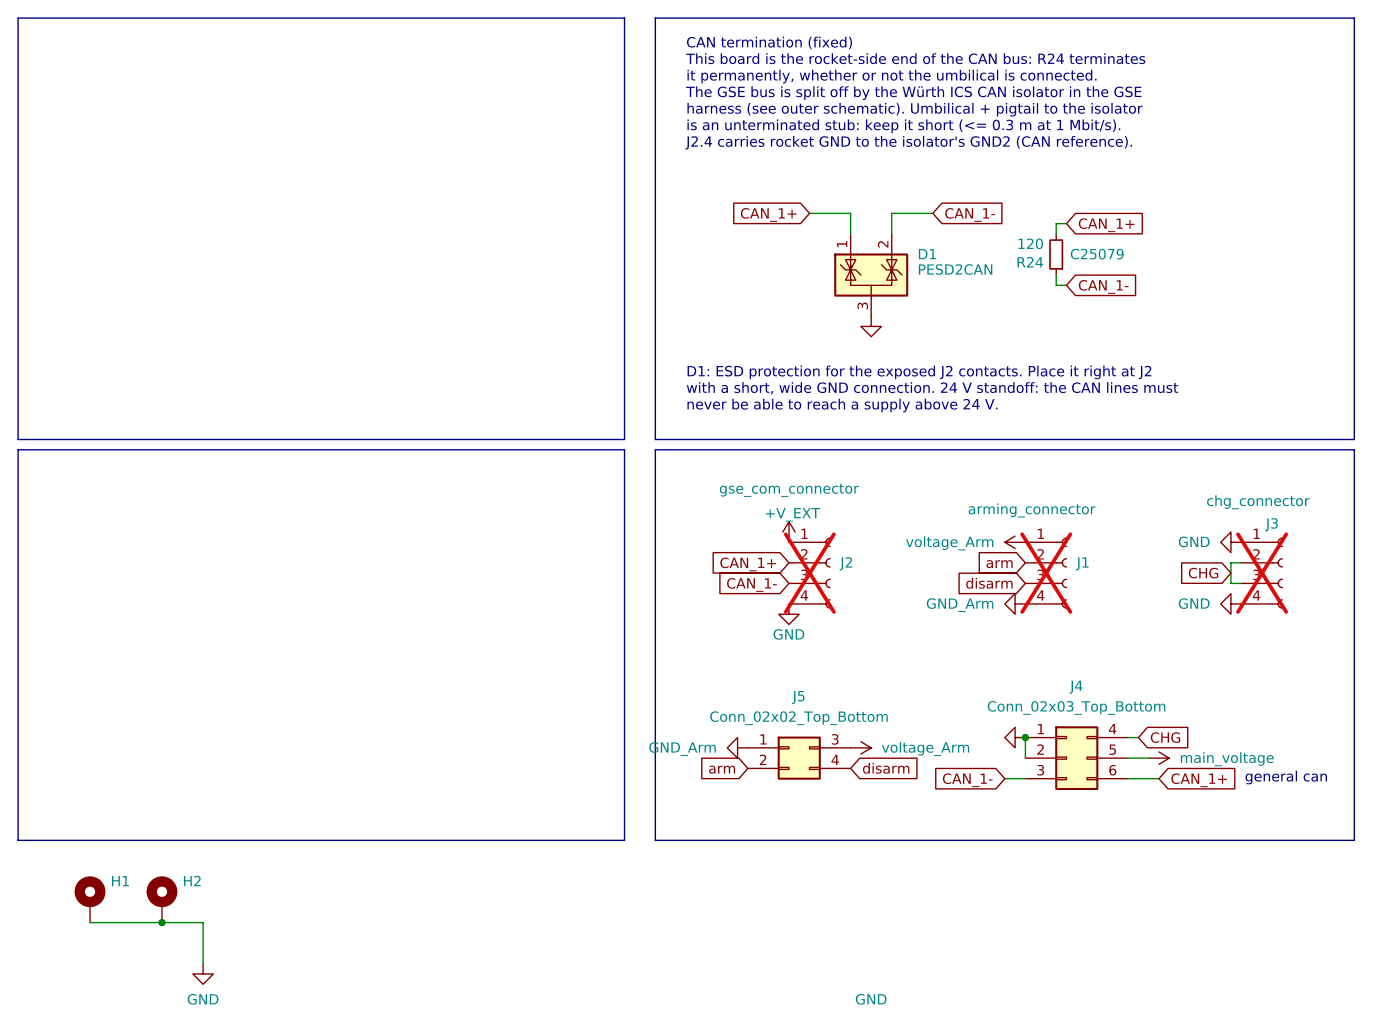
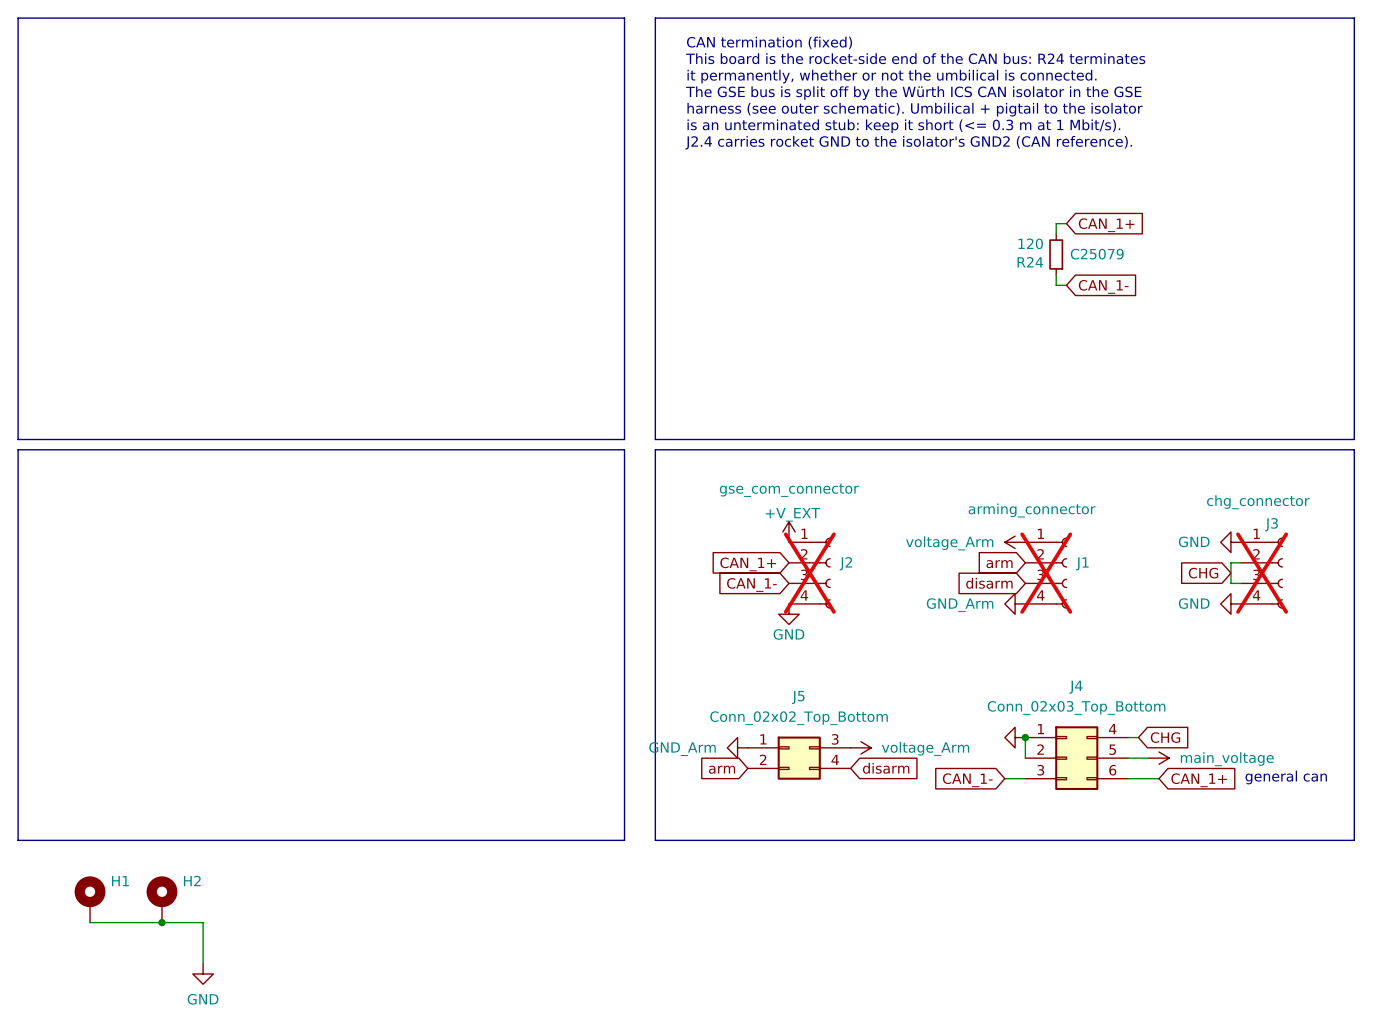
wire: (809, 213) (850, 213) (850, 233) -> none
wire: (932, 213) (891, 213) (891, 233) -> none
global label: CAN_1+ (768, 214) -> none
global label: CAN_1- (970, 214) -> none
D1: PESD2CAN (871, 275) -> none
power symbol: GND (871, 326) -> none
text: D1: ESD protection for the exposed J2 contacts. Place it right at J2 (919, 372) -> none
text: with a short, wide GND connection. 24 V standoff: the CAN lines must (932, 388) -> none
text: never be able to reach a supply above 24 V. (842, 405) -> none

